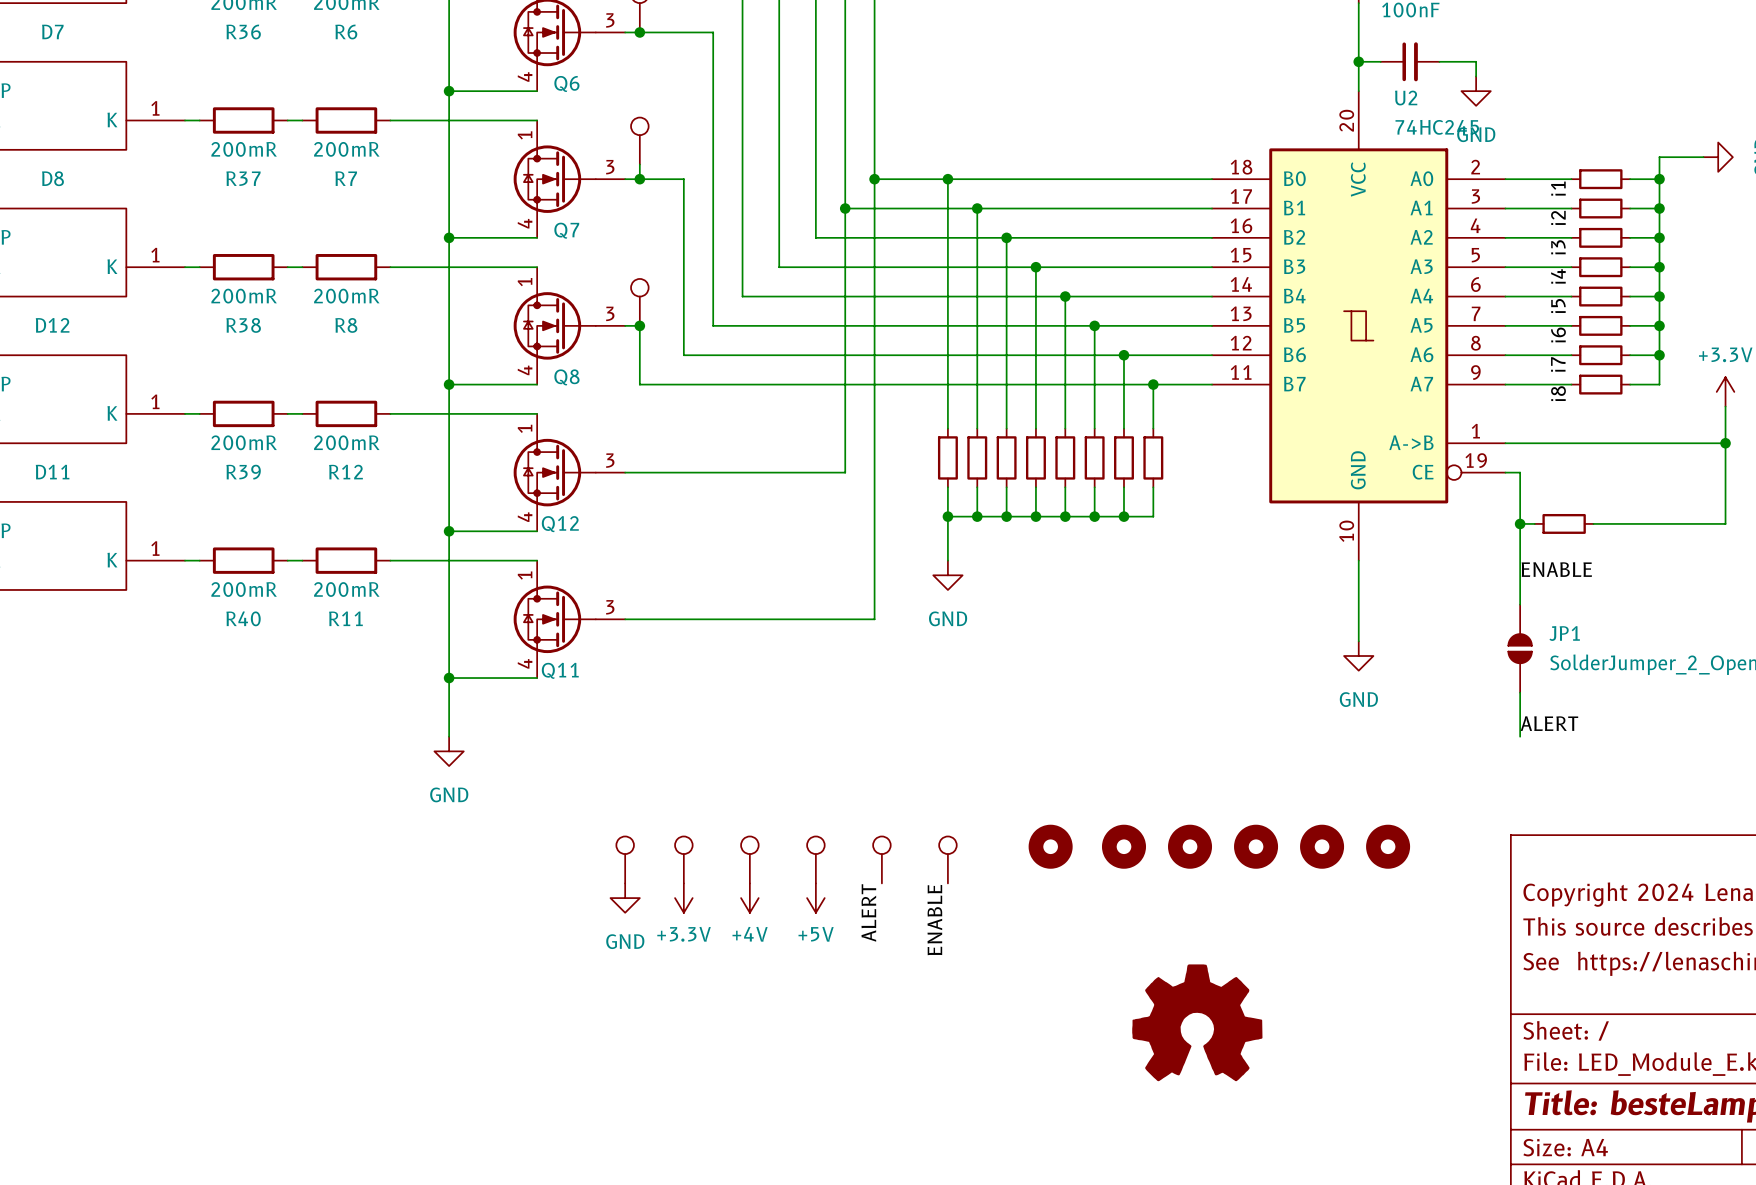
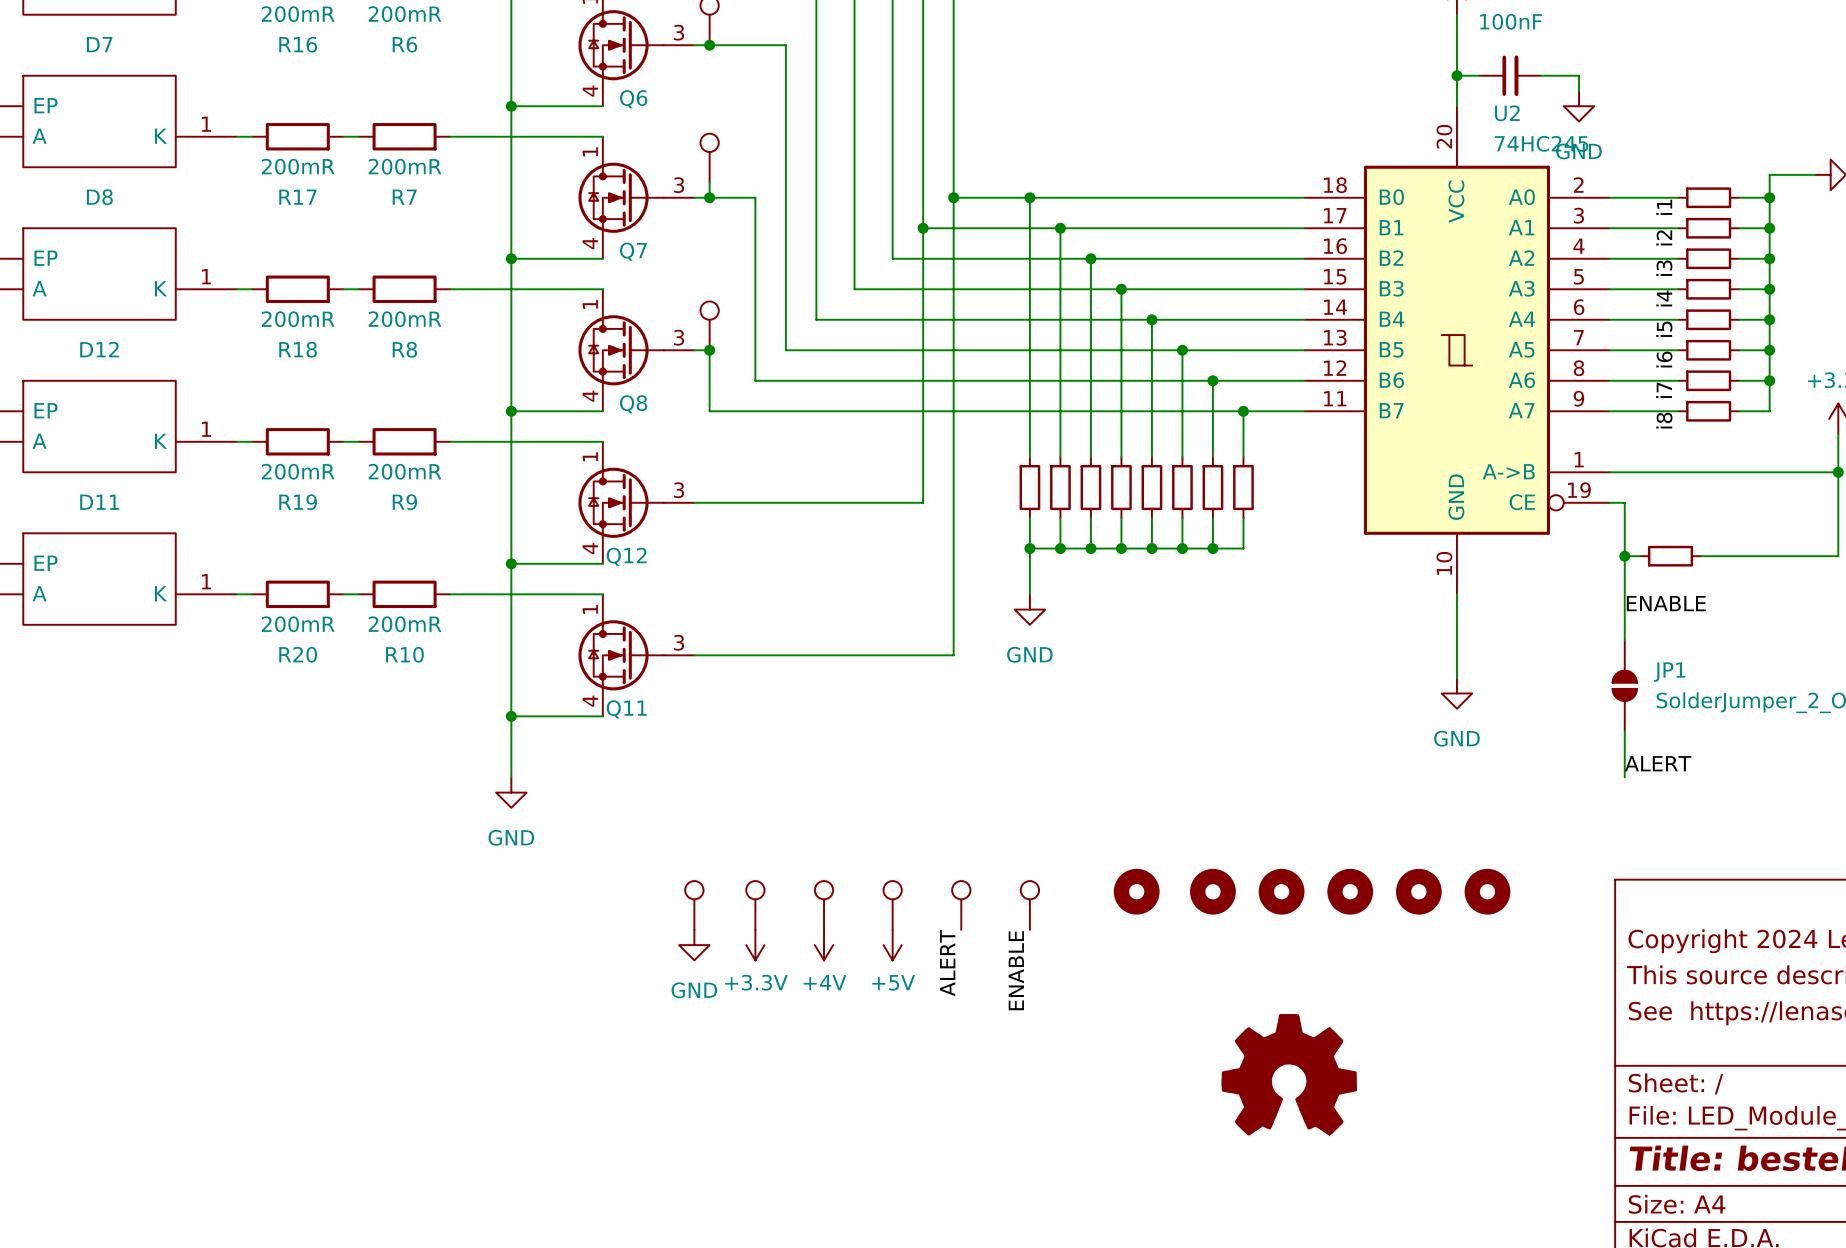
R36 name: R36 (243, 32) -> R16 (298, 44)
R37 name: R37 (243, 178) -> R17 (297, 197)
R38 name: R38 (243, 325) -> R18 (298, 349)
R39 name: R39 (243, 472) -> R19 (298, 502)
R12 name: R12 (345, 472) -> R9 (404, 502)
R40 name: R40 (243, 618) -> R20 (298, 654)
R11 name: R11 (345, 618) -> R10 (404, 654)

